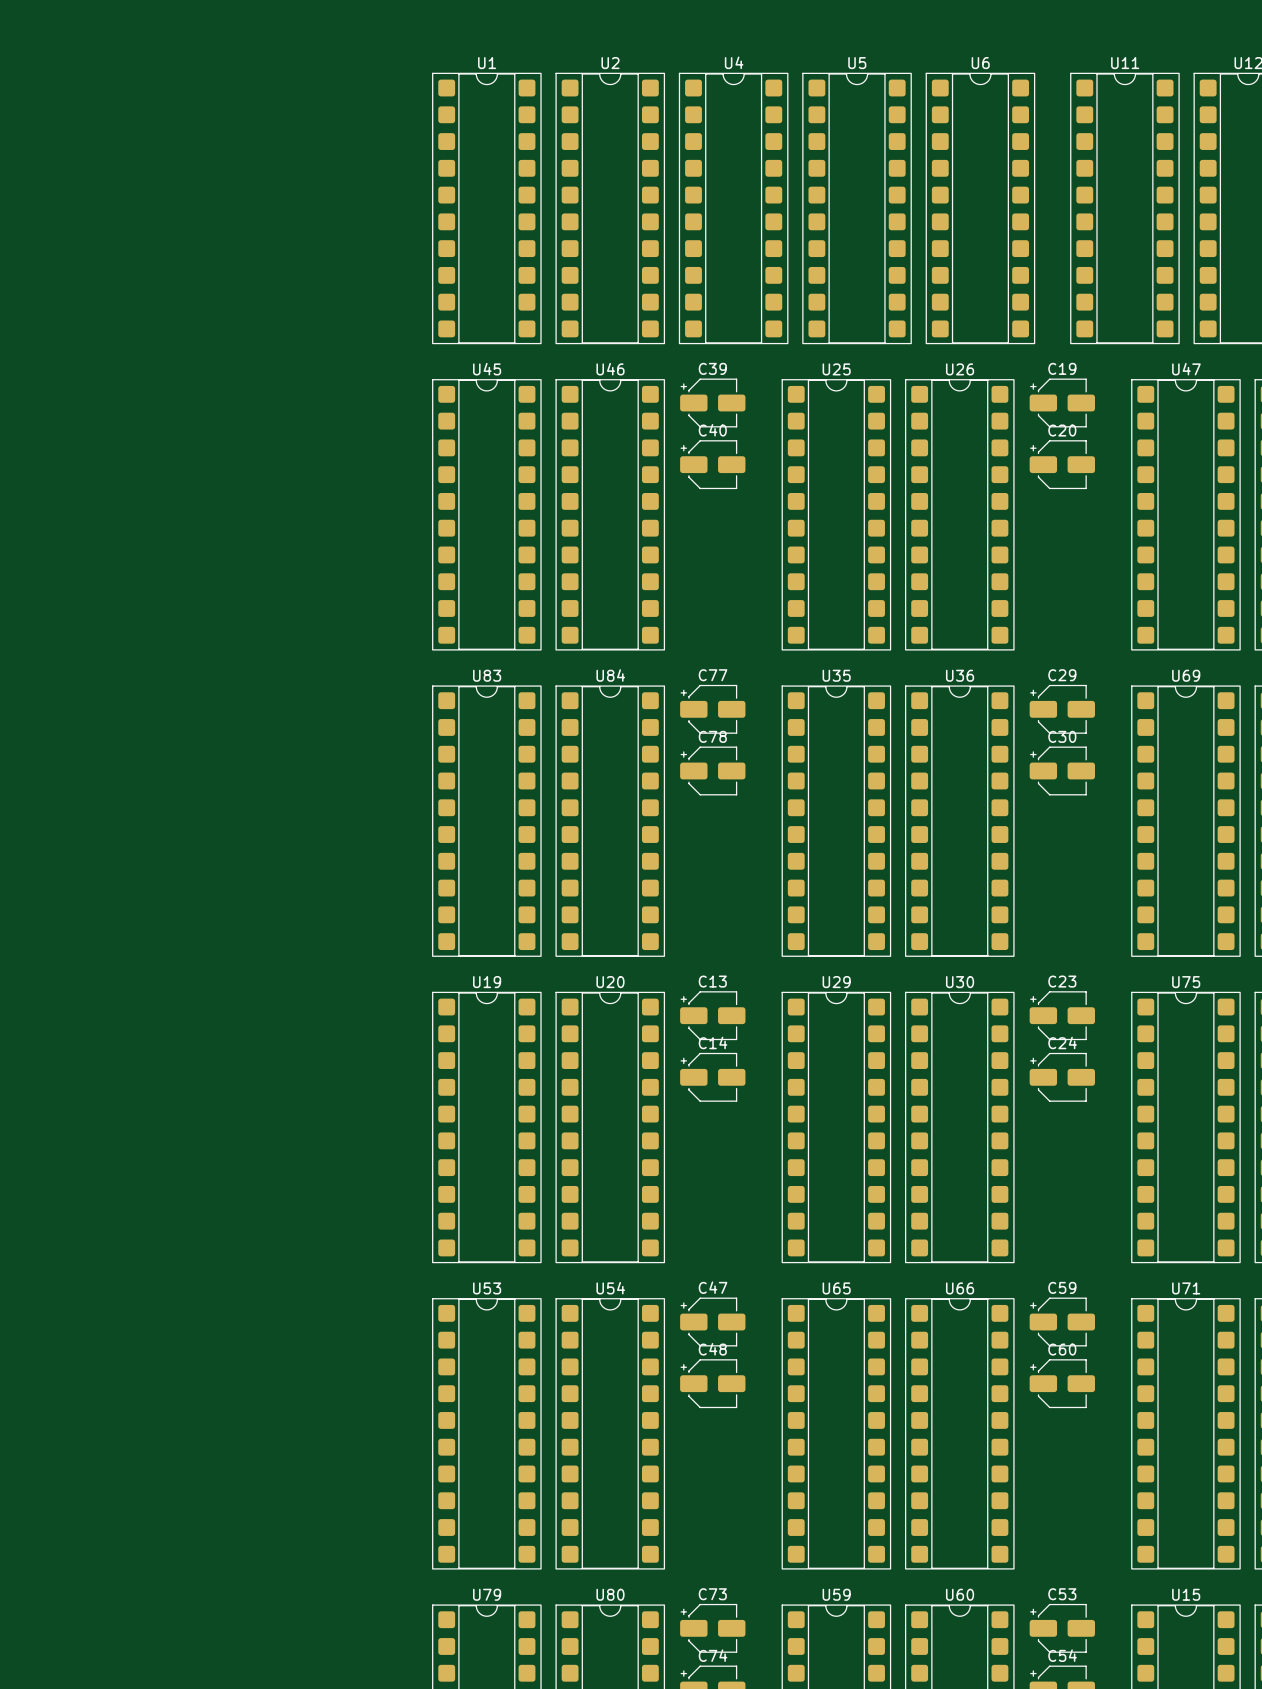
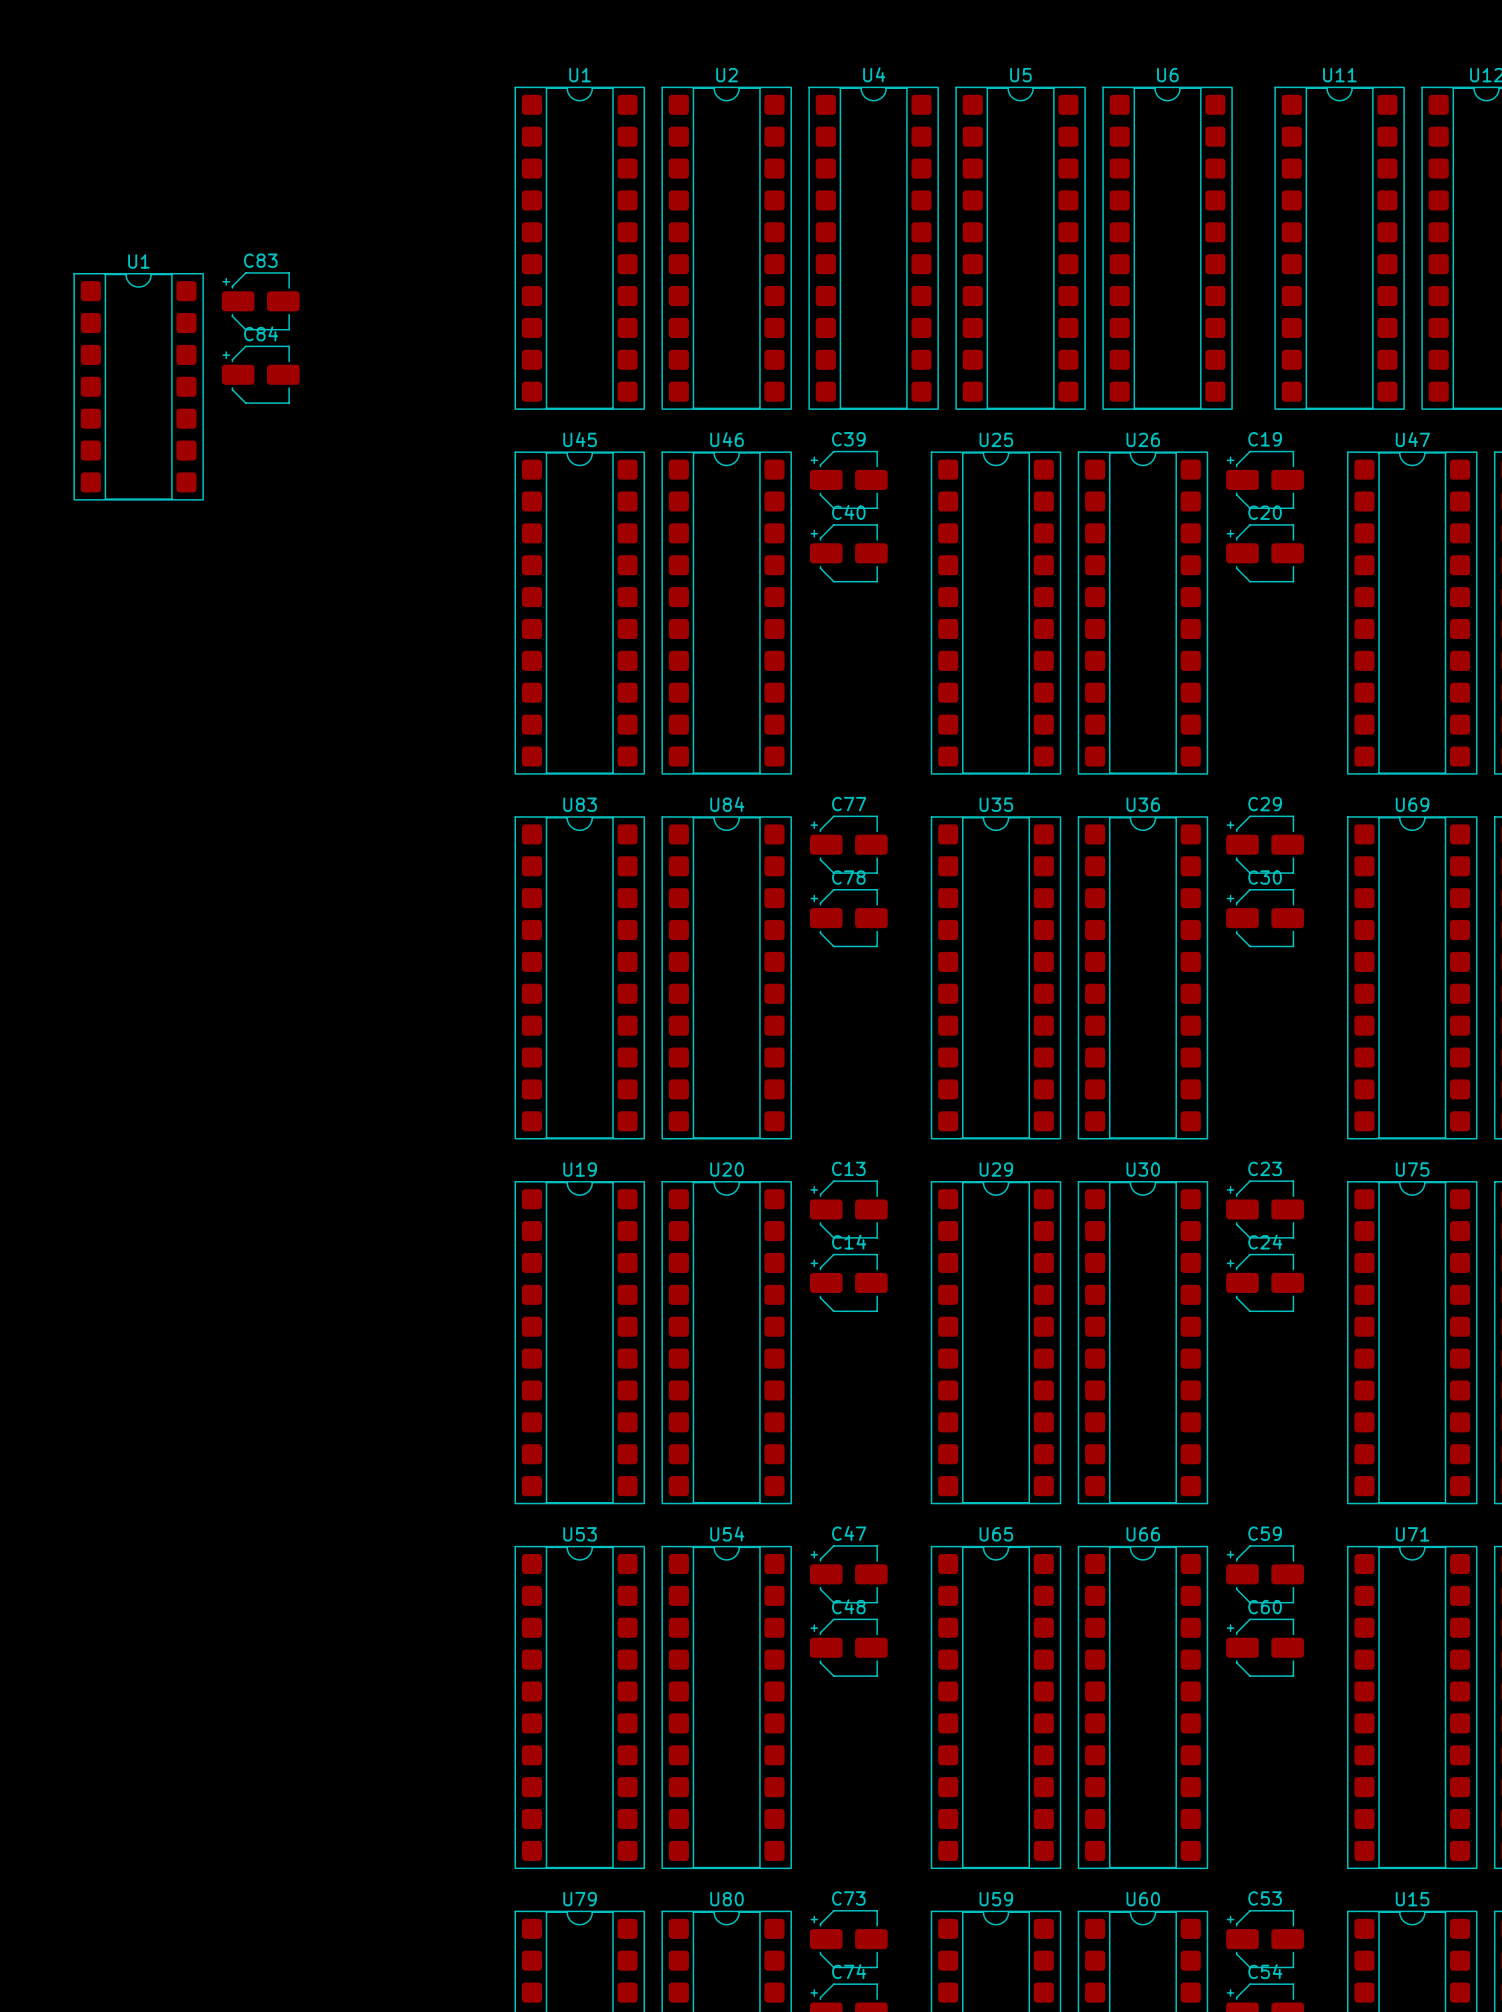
C83: none -> (260, 301)
C84: none -> (260, 374)
U1: none -> (138, 386)

